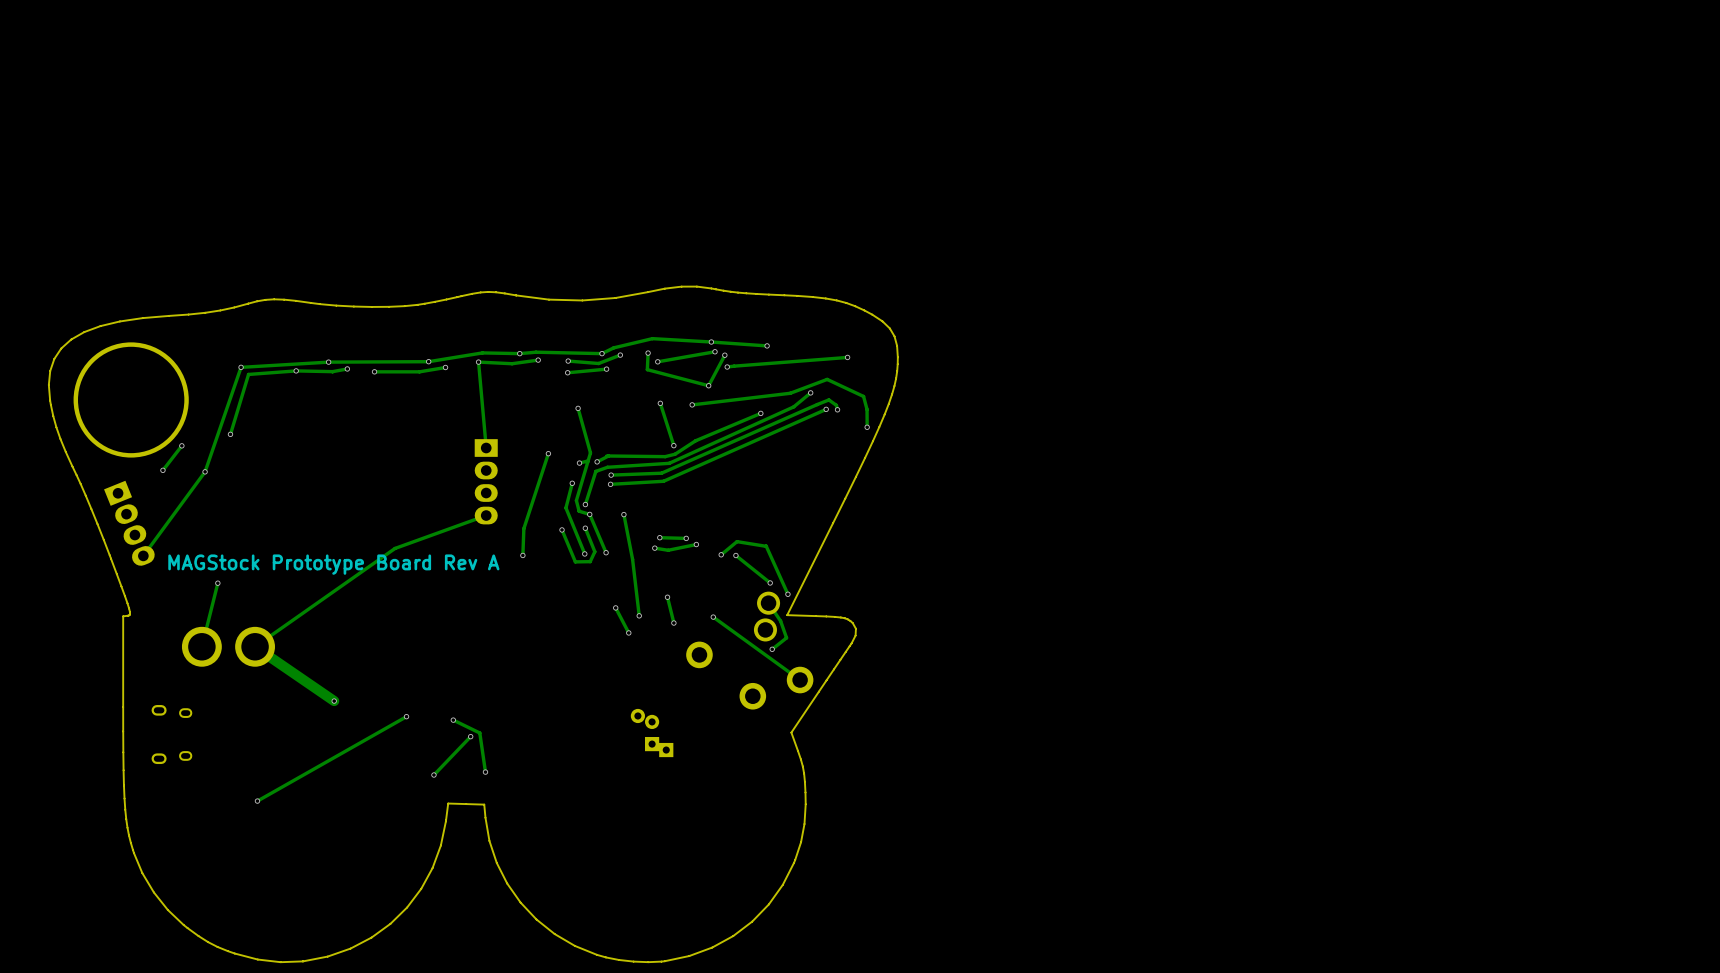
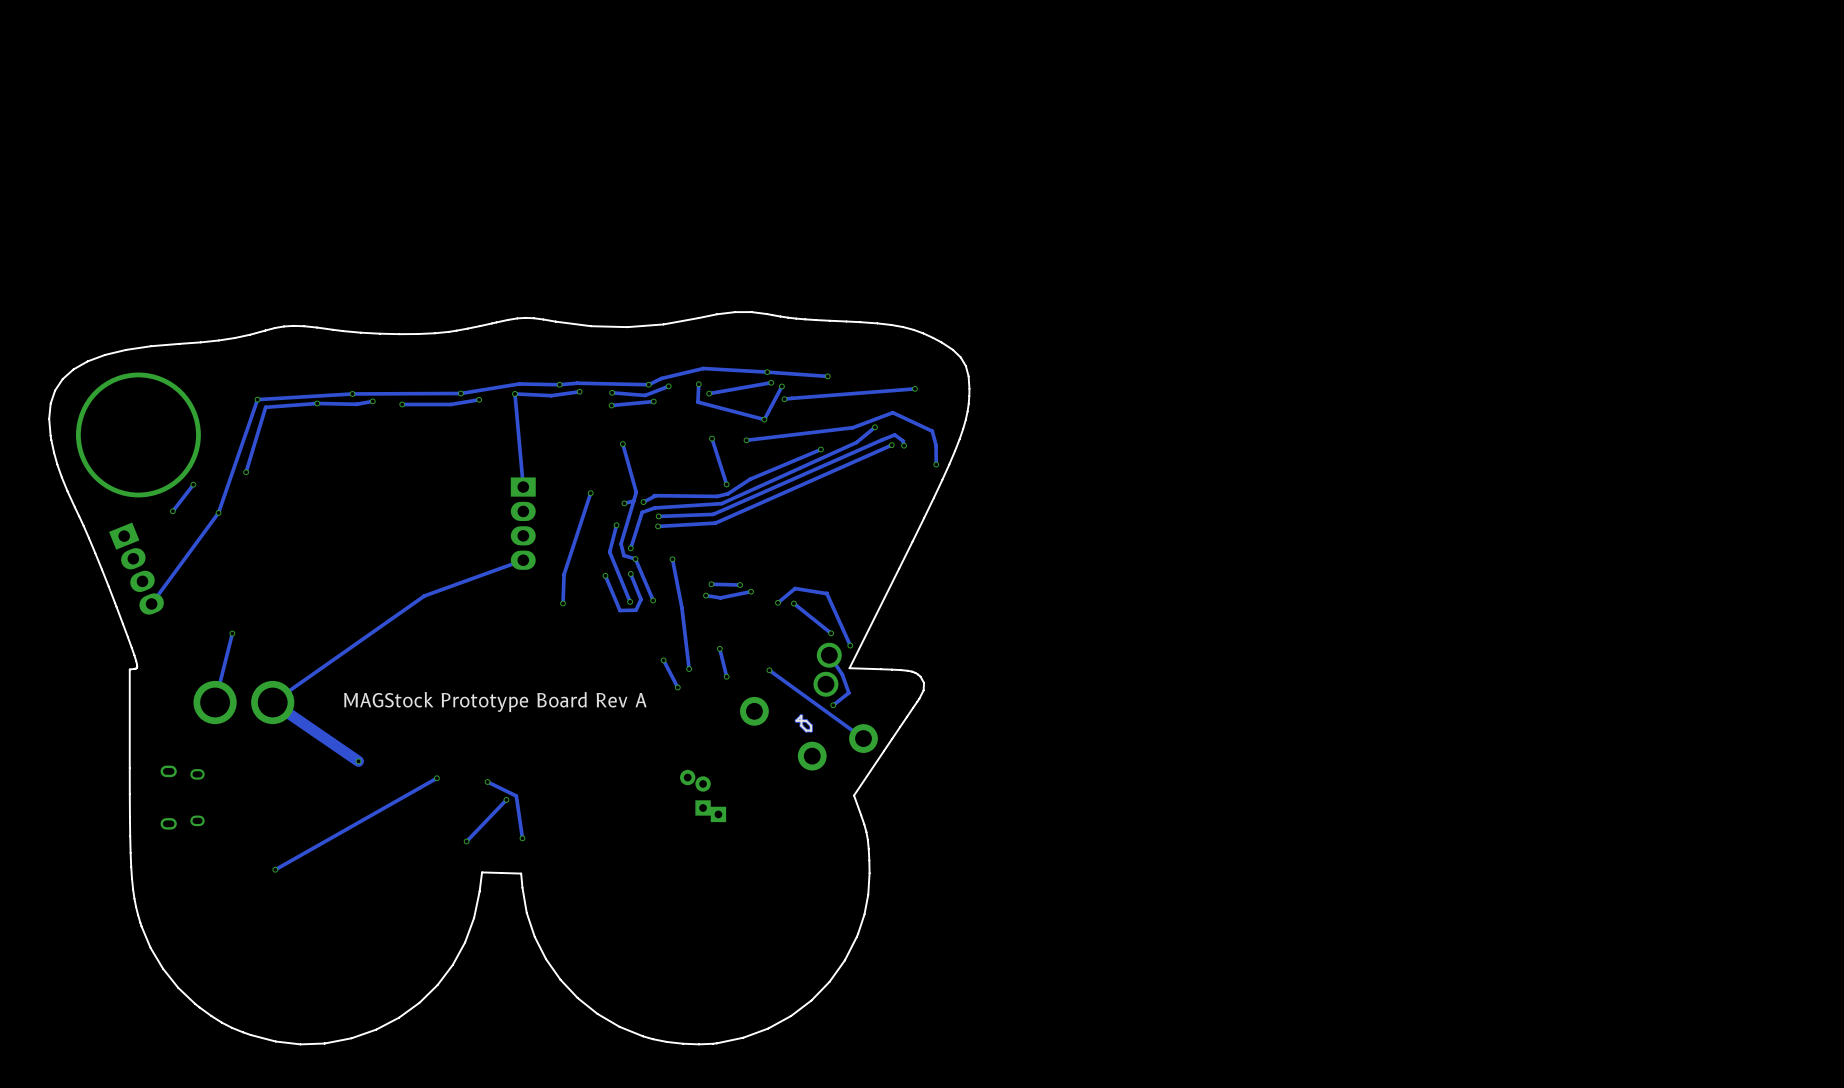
text position: MAGStock Prototype Board Rev A (333, 564) -> MAGStock Prototype Board Rev A (495, 702)
track: none -> (801, 715) (801, 725) (806, 730) (811, 730) (811, 725) (806, 720) (796, 720) (801, 715)
line: none -> (801, 715) (801, 725) (806, 730) (811, 730) (811, 725) (806, 720) (796, 720) (801, 715)

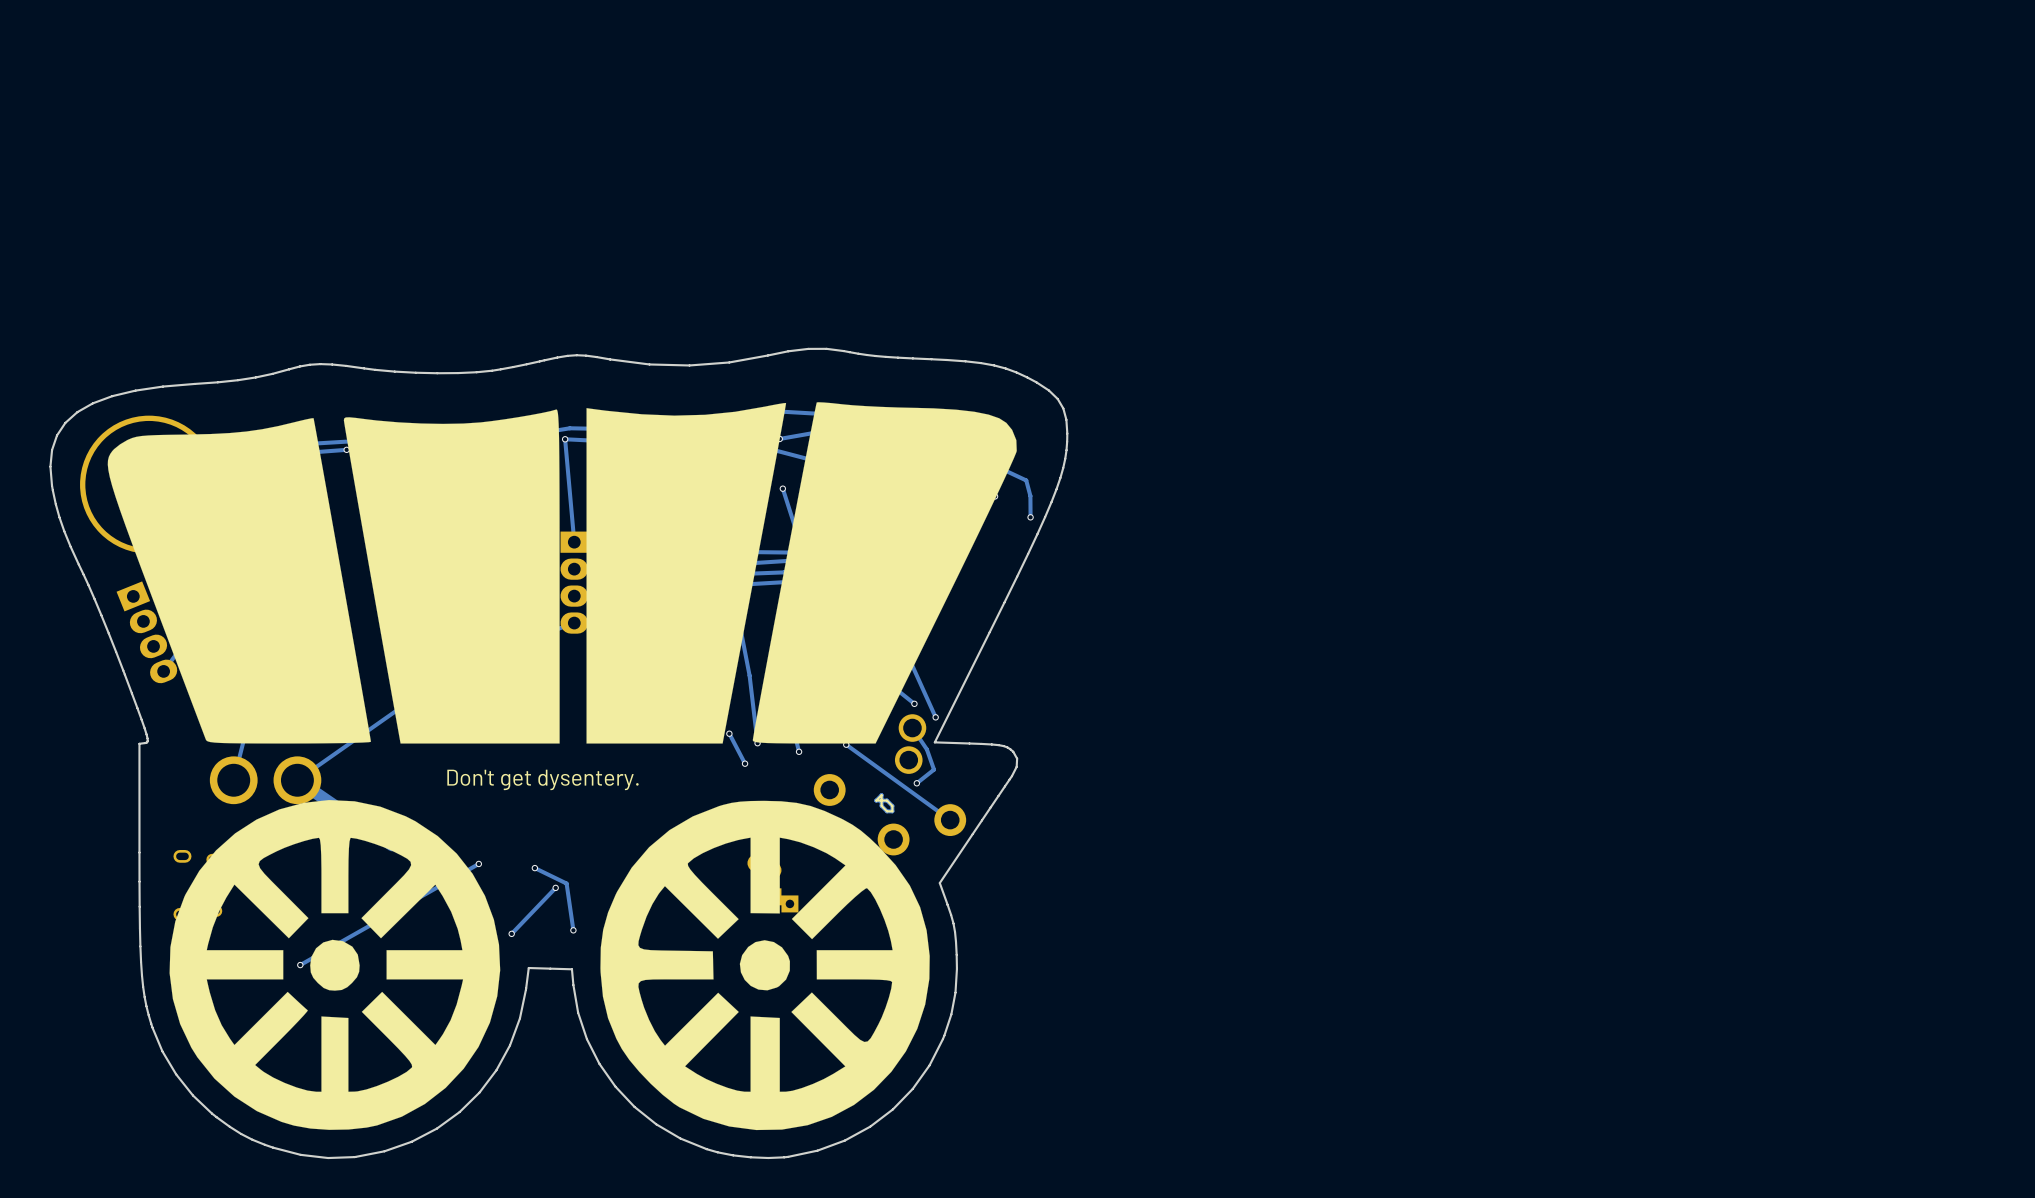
drawing shape: [48, 311, 971, 1046] -> [49, 347, 1069, 1160]
text: MAGStock Prototype Board Rev A (495, 702) -> Don't get dysentery. (542, 779)

